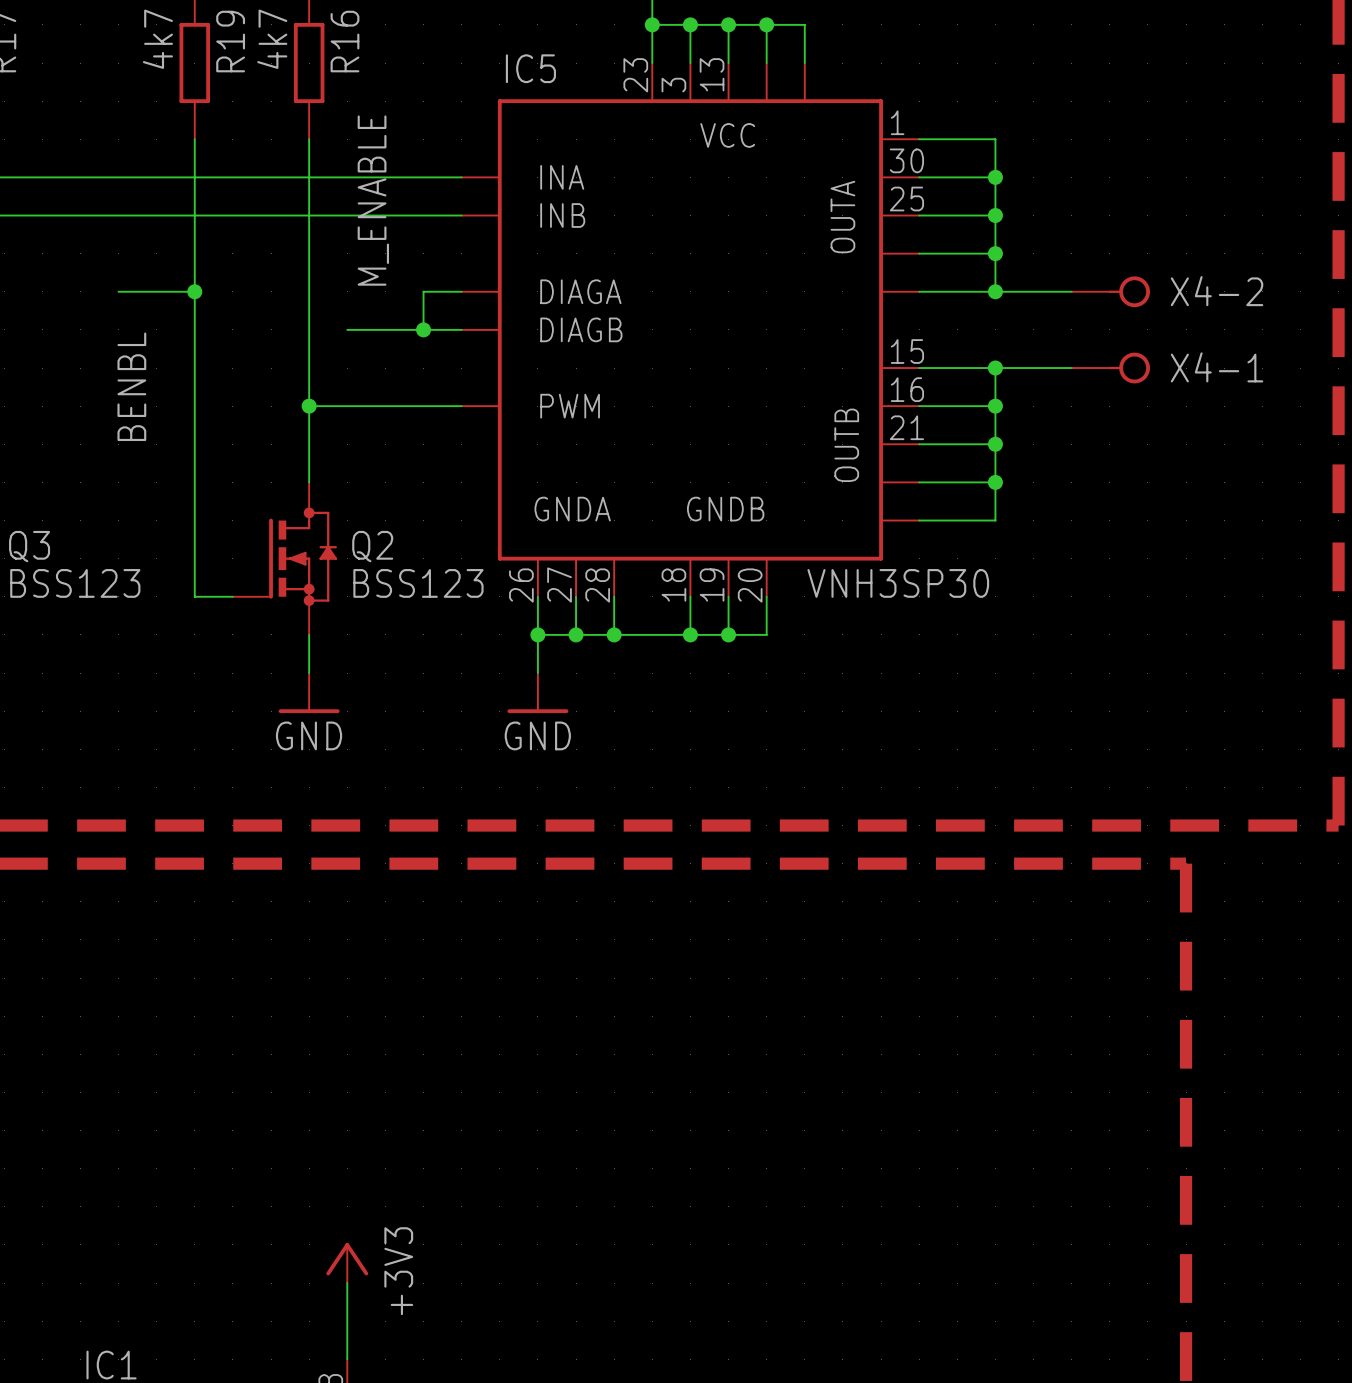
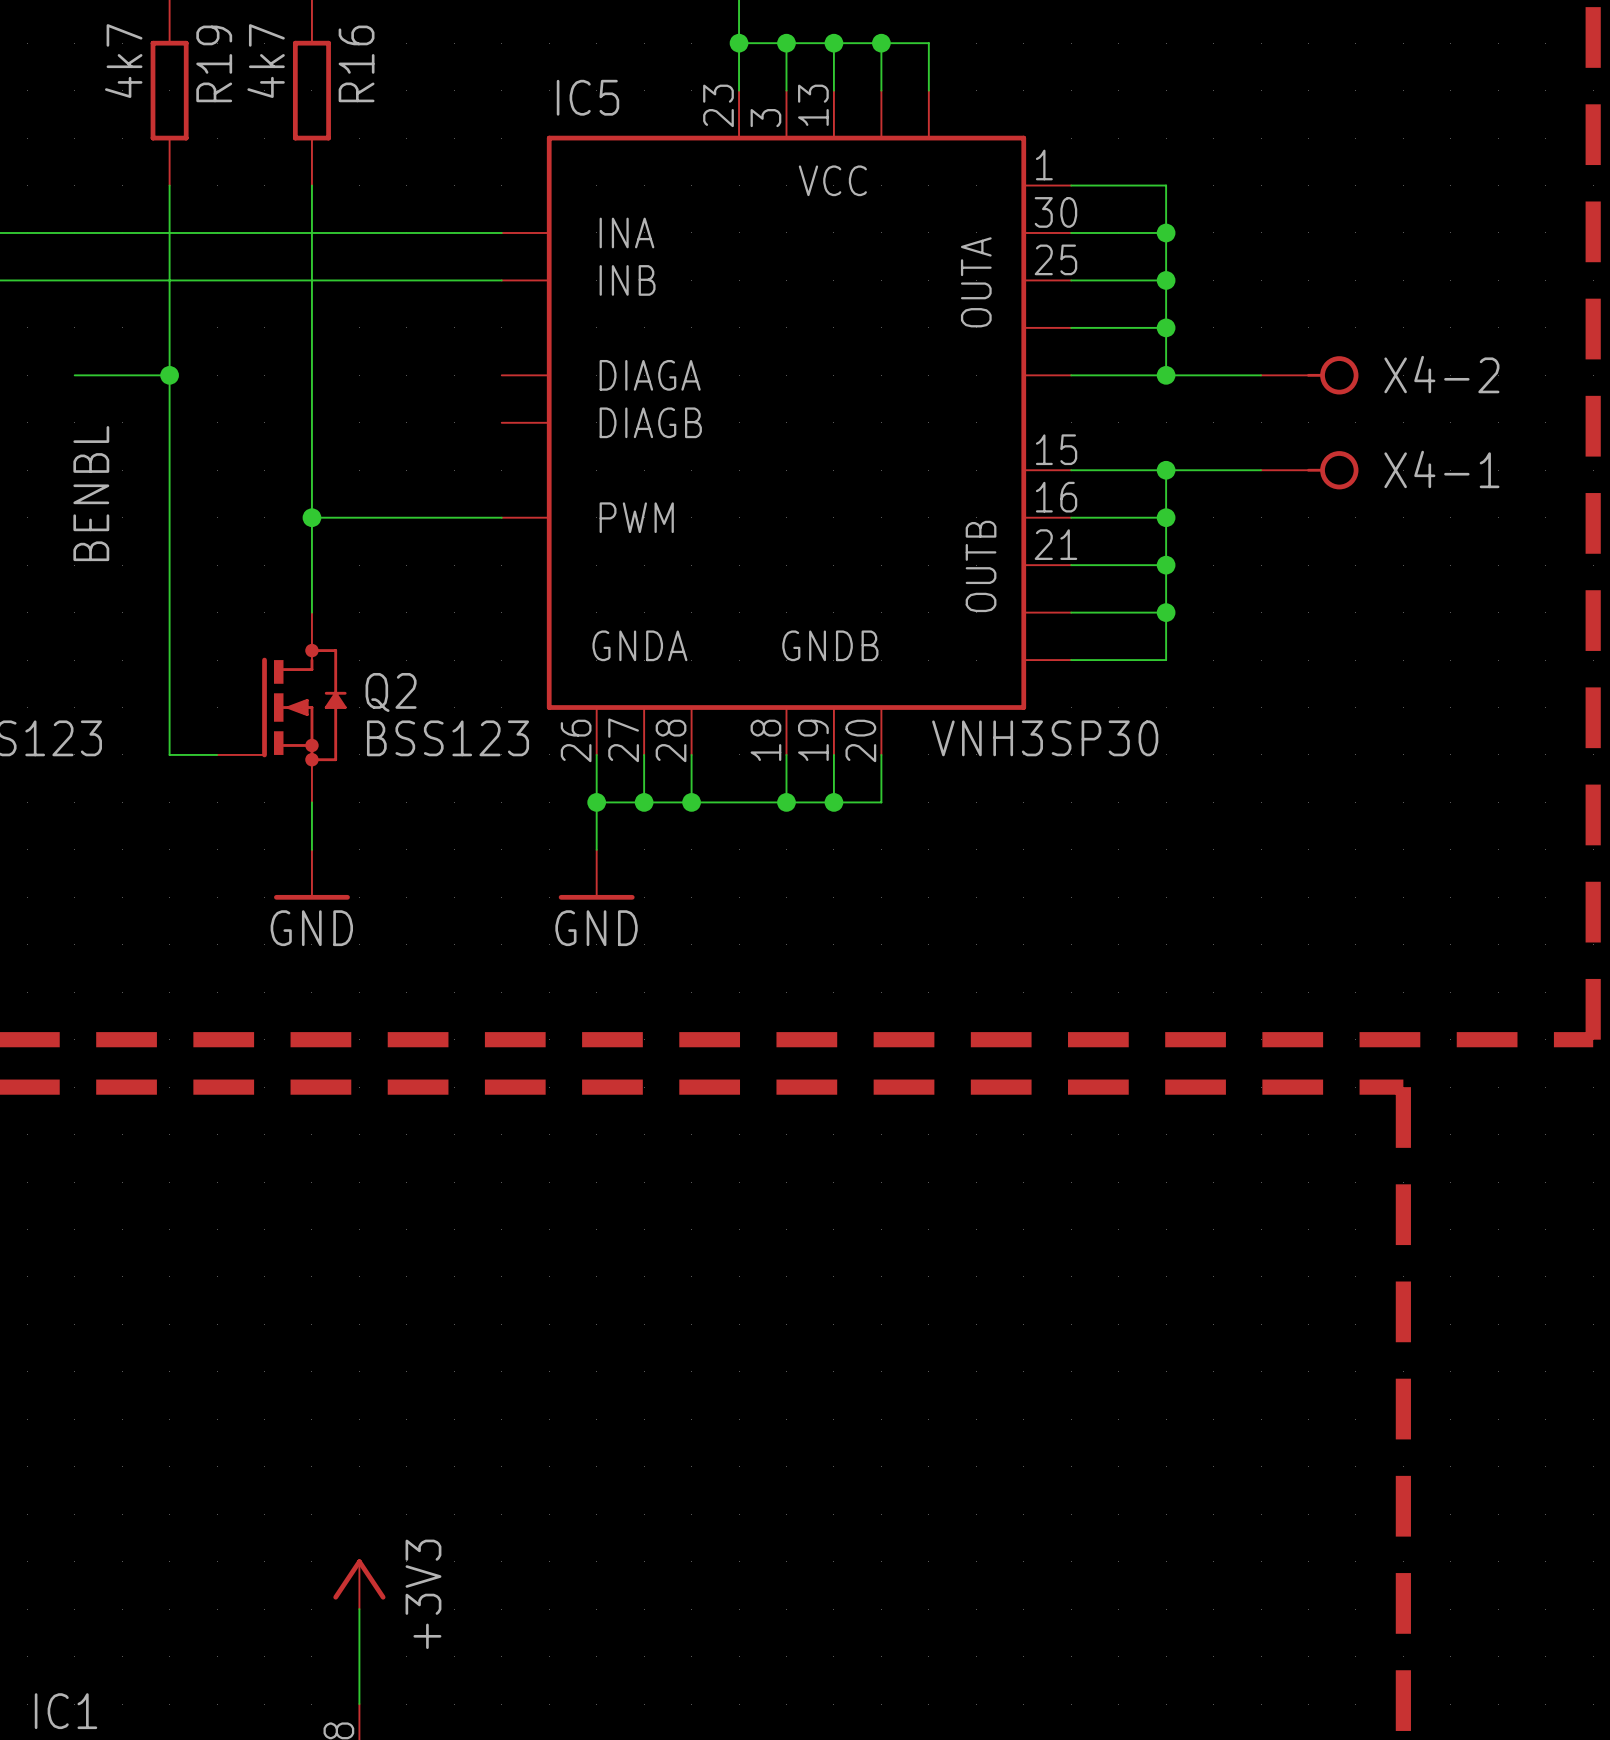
label: M_ENABLE (373, 200) -> none
wire: (461, 291) (423, 291) (423, 329) -> none
wire: (347, 329) (461, 329) -> none
junction: (423, 329) -> none

